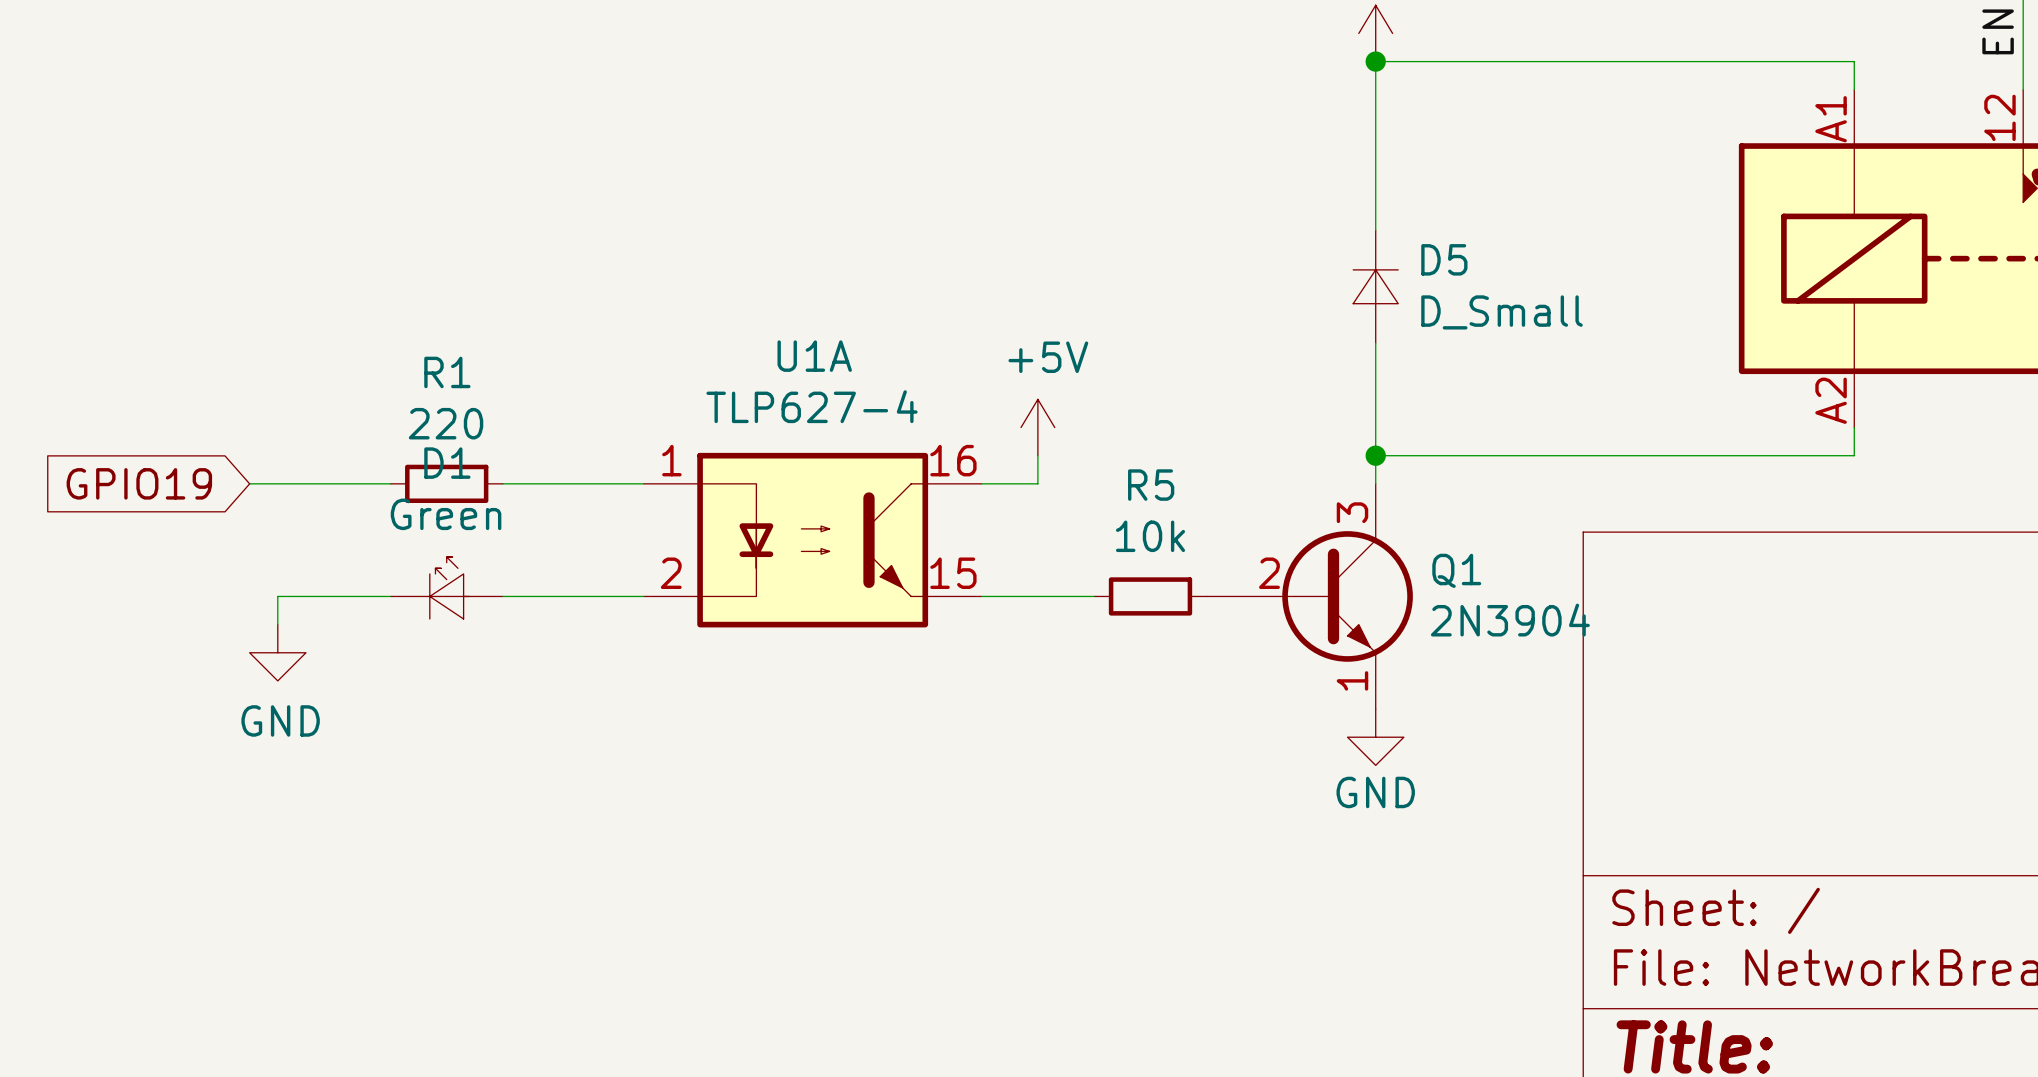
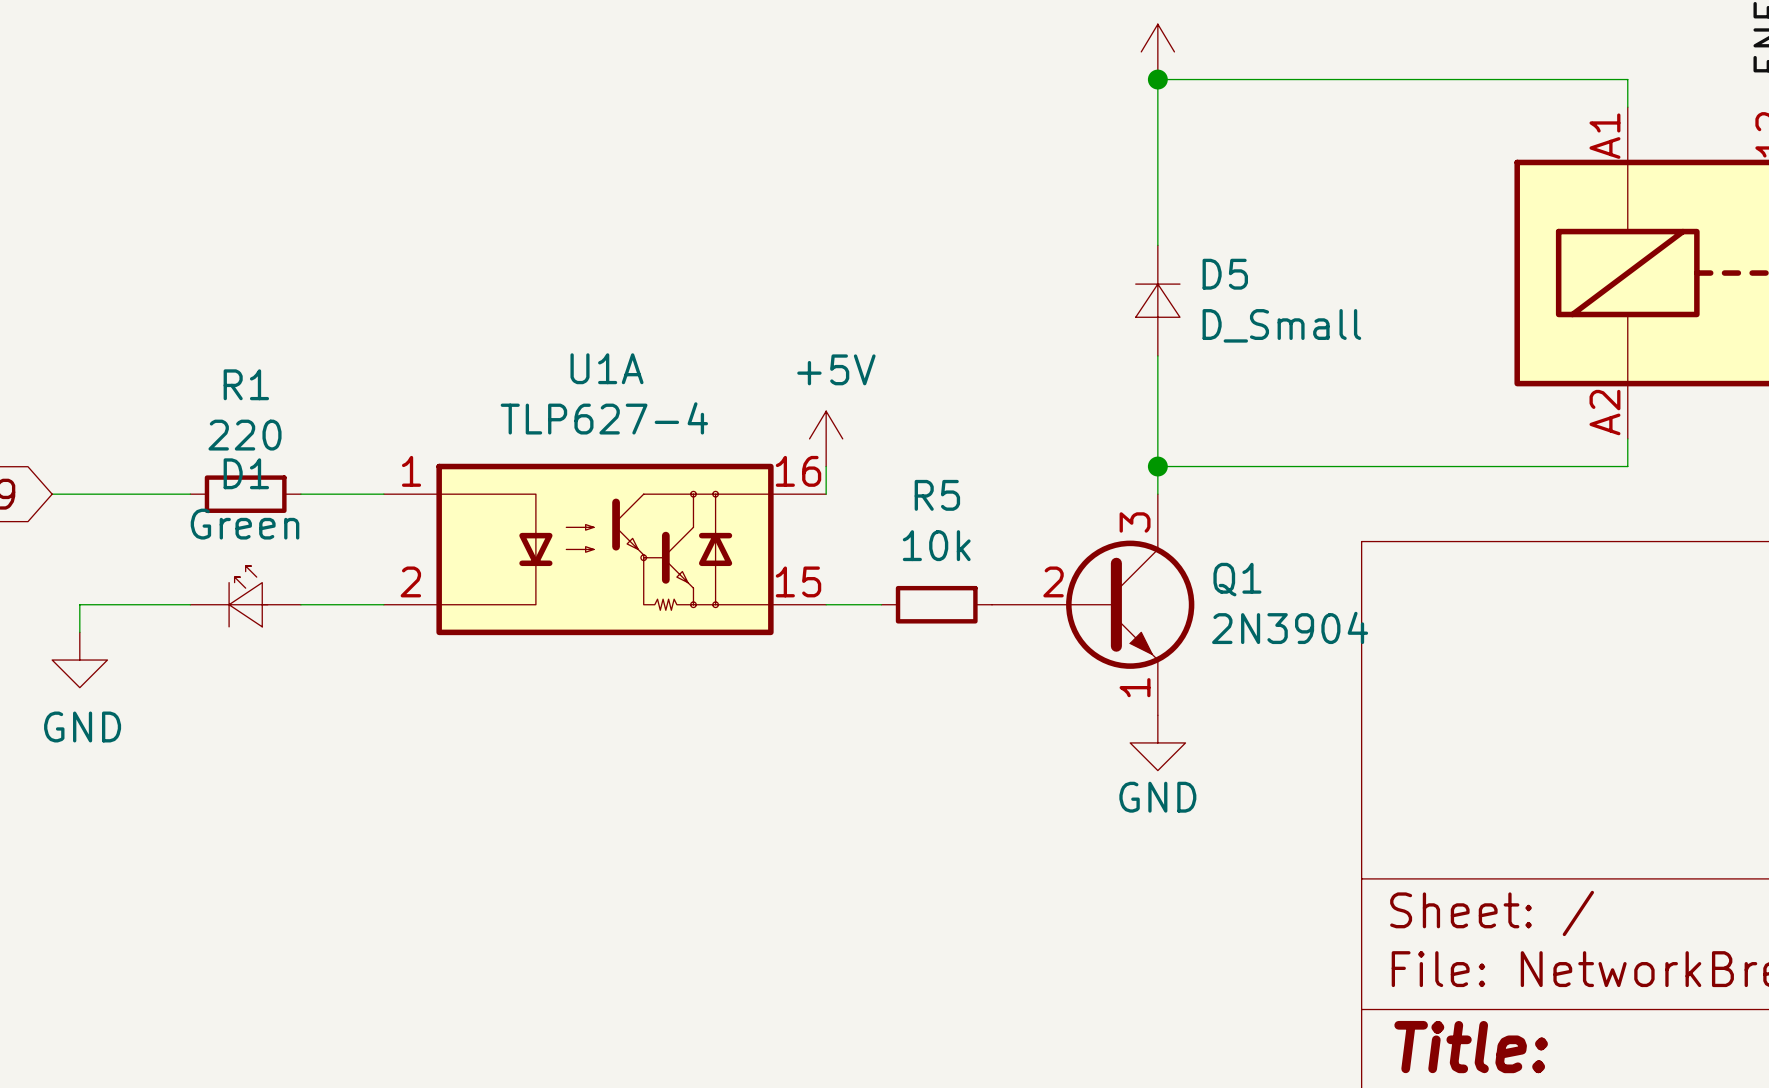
U1A symbol: [643, 452, 982, 628] -> [383, 463, 827, 636]

